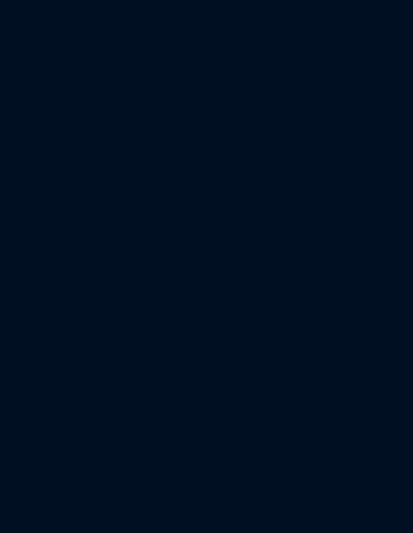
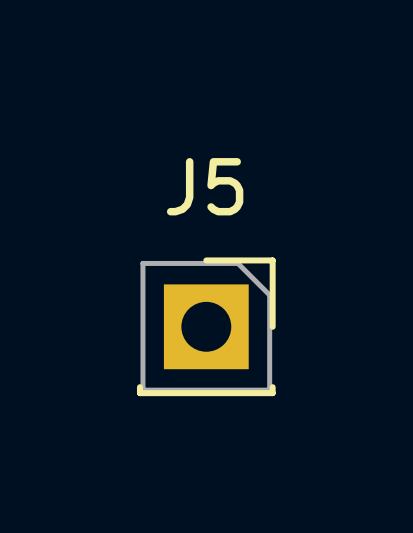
J5: none -> (206, 326)

